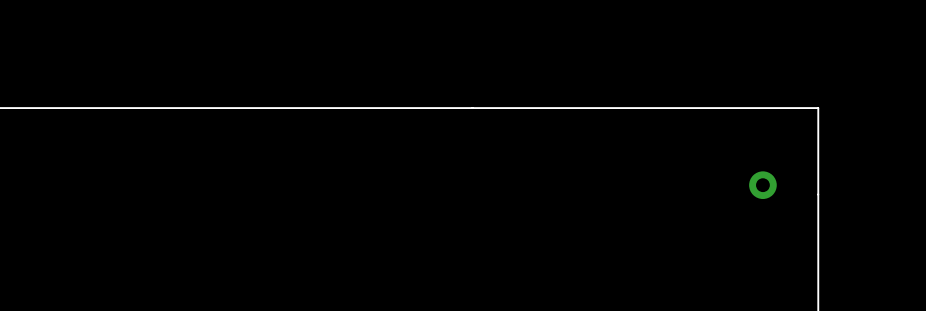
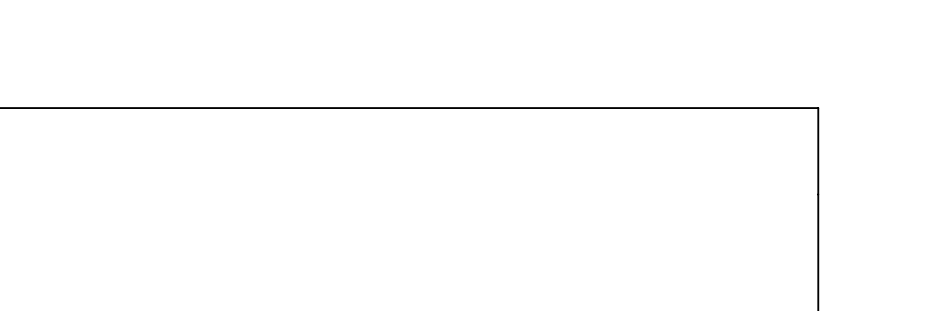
via: (762, 185) -> none

